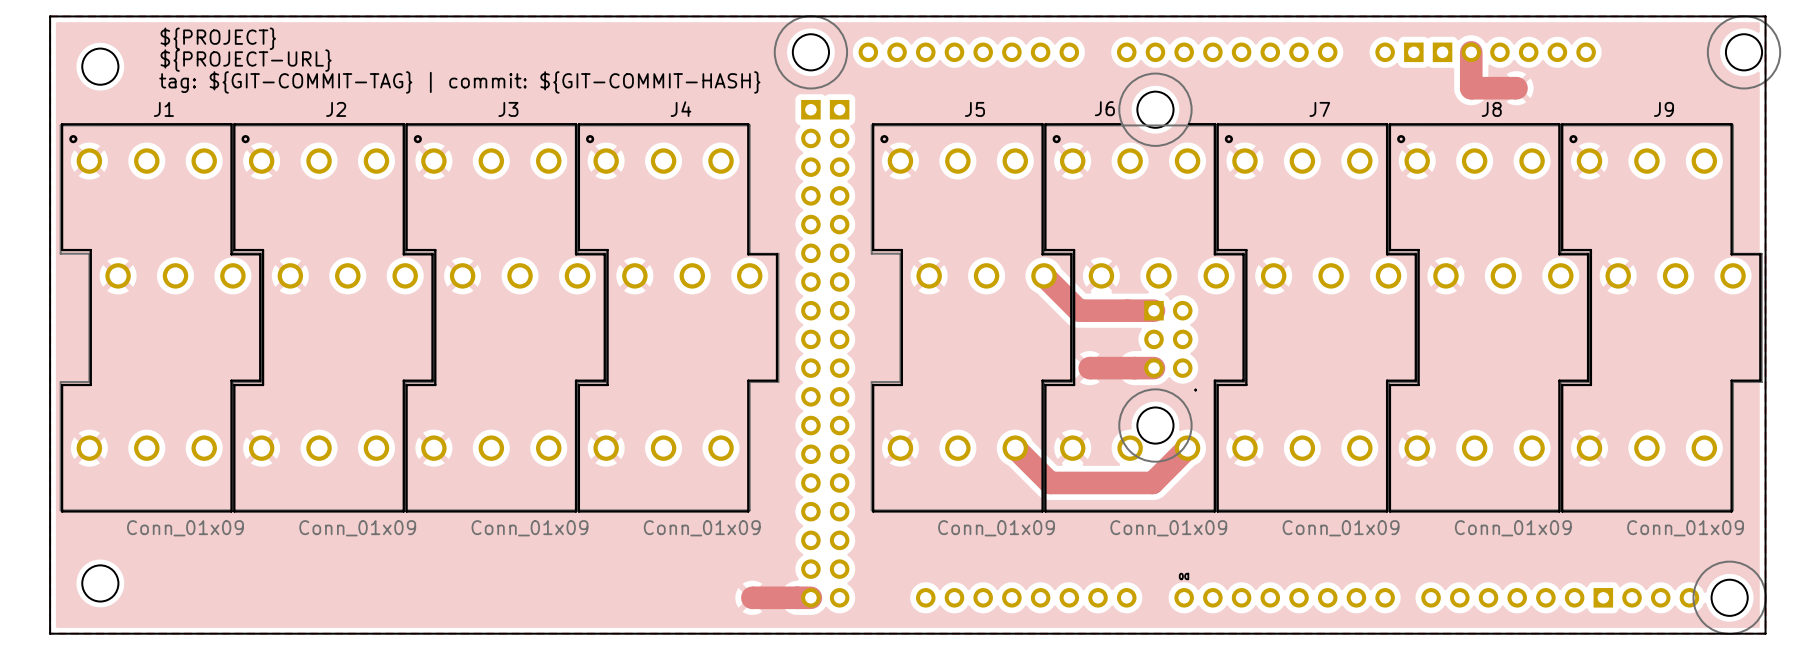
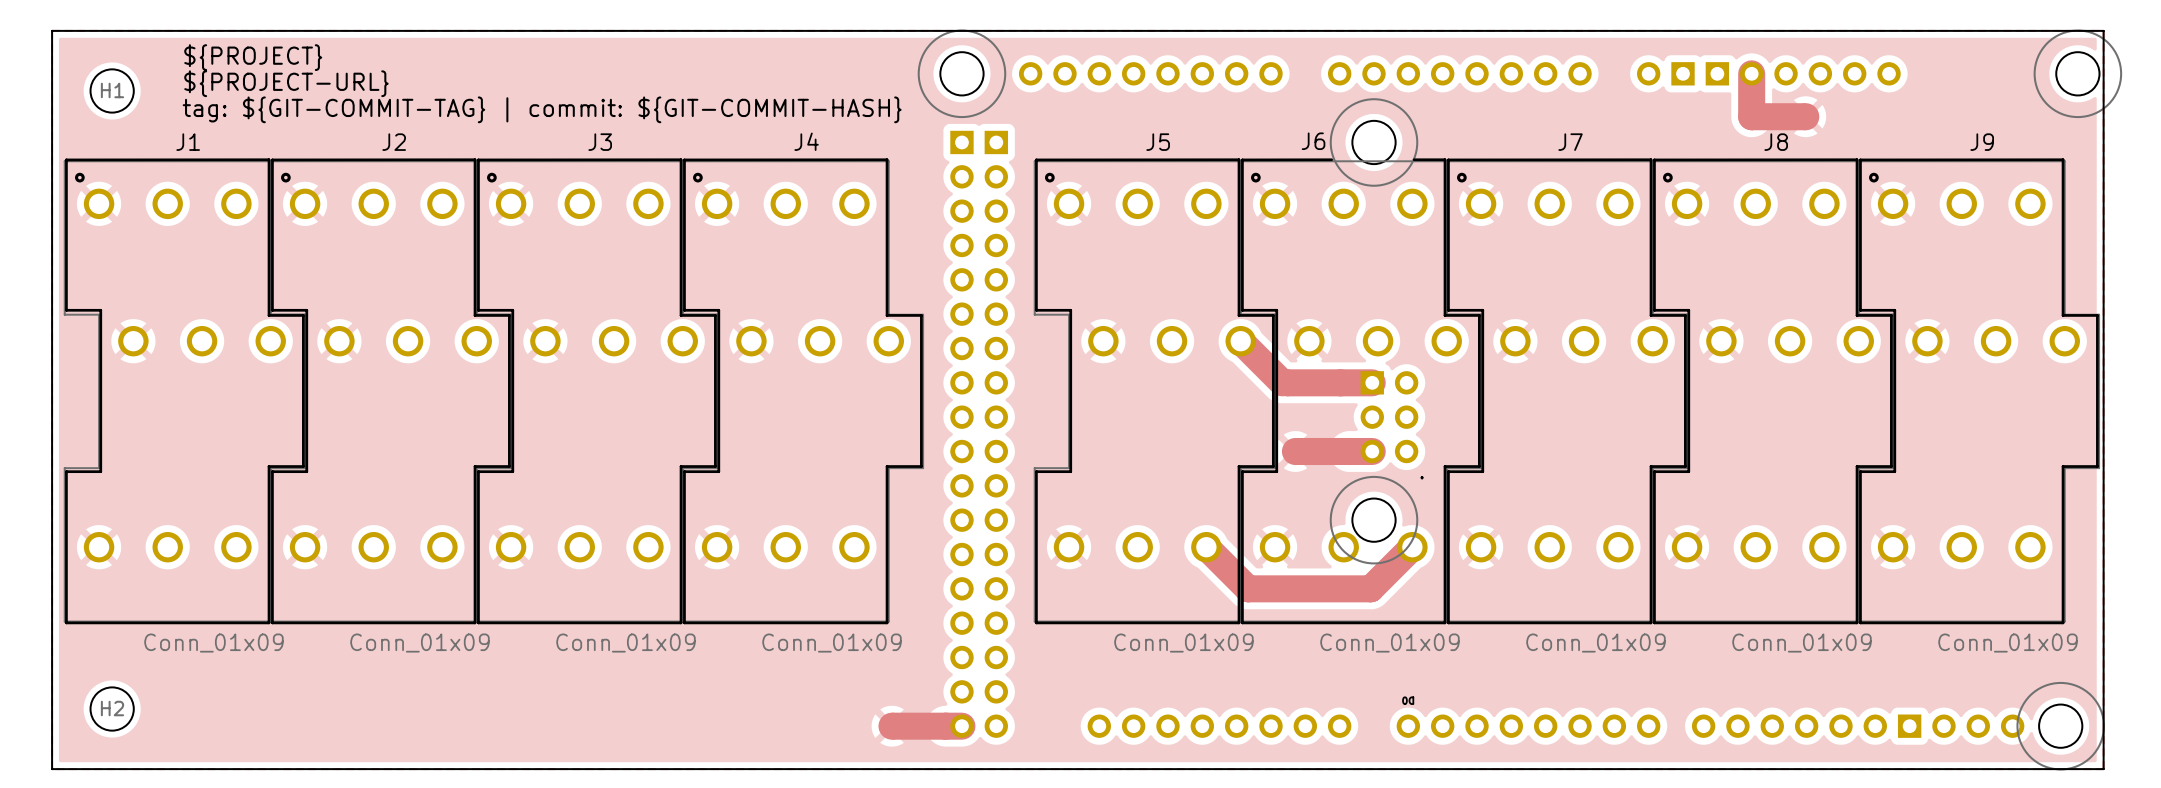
H1 name: none -> H1 (112, 90)
H2 name: none -> H2 (112, 708)

